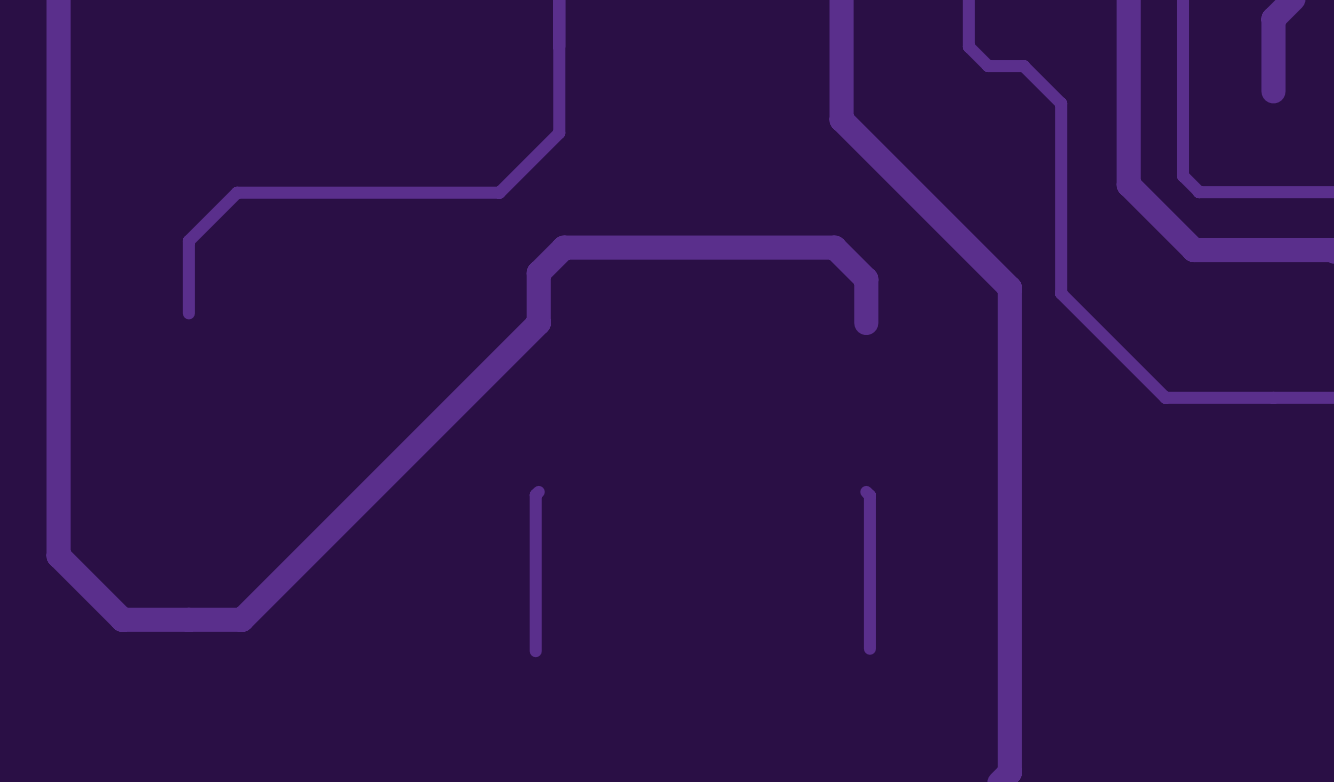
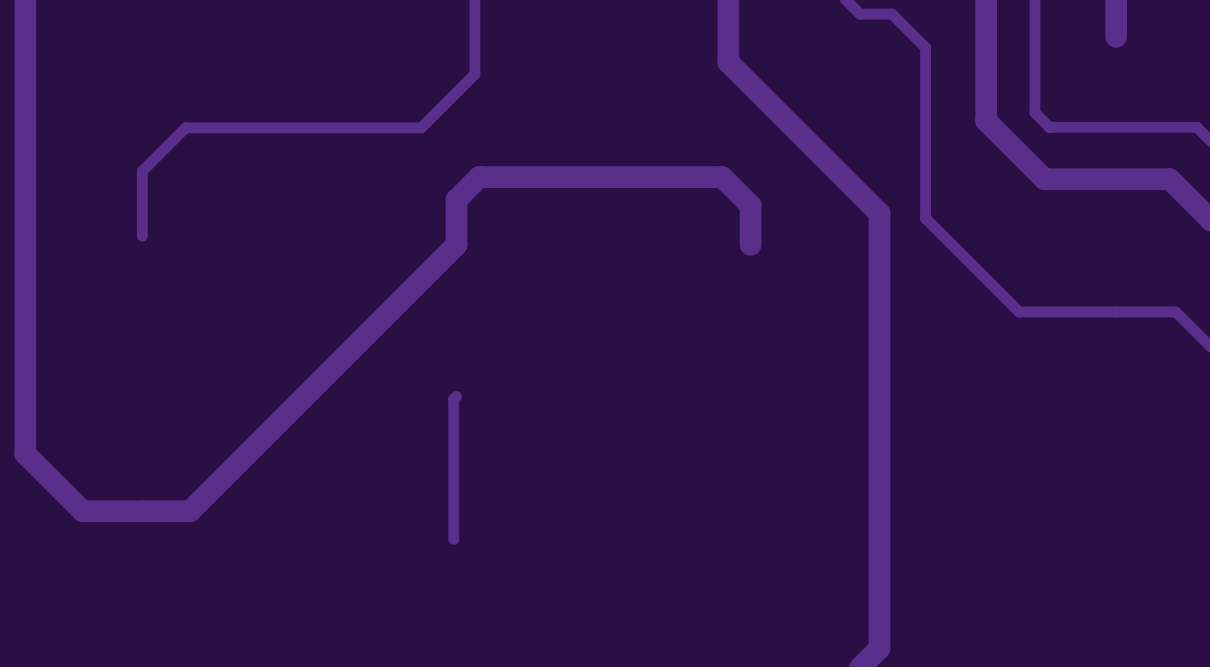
track: (866, 491) (869, 495) (869, 648) -> none

